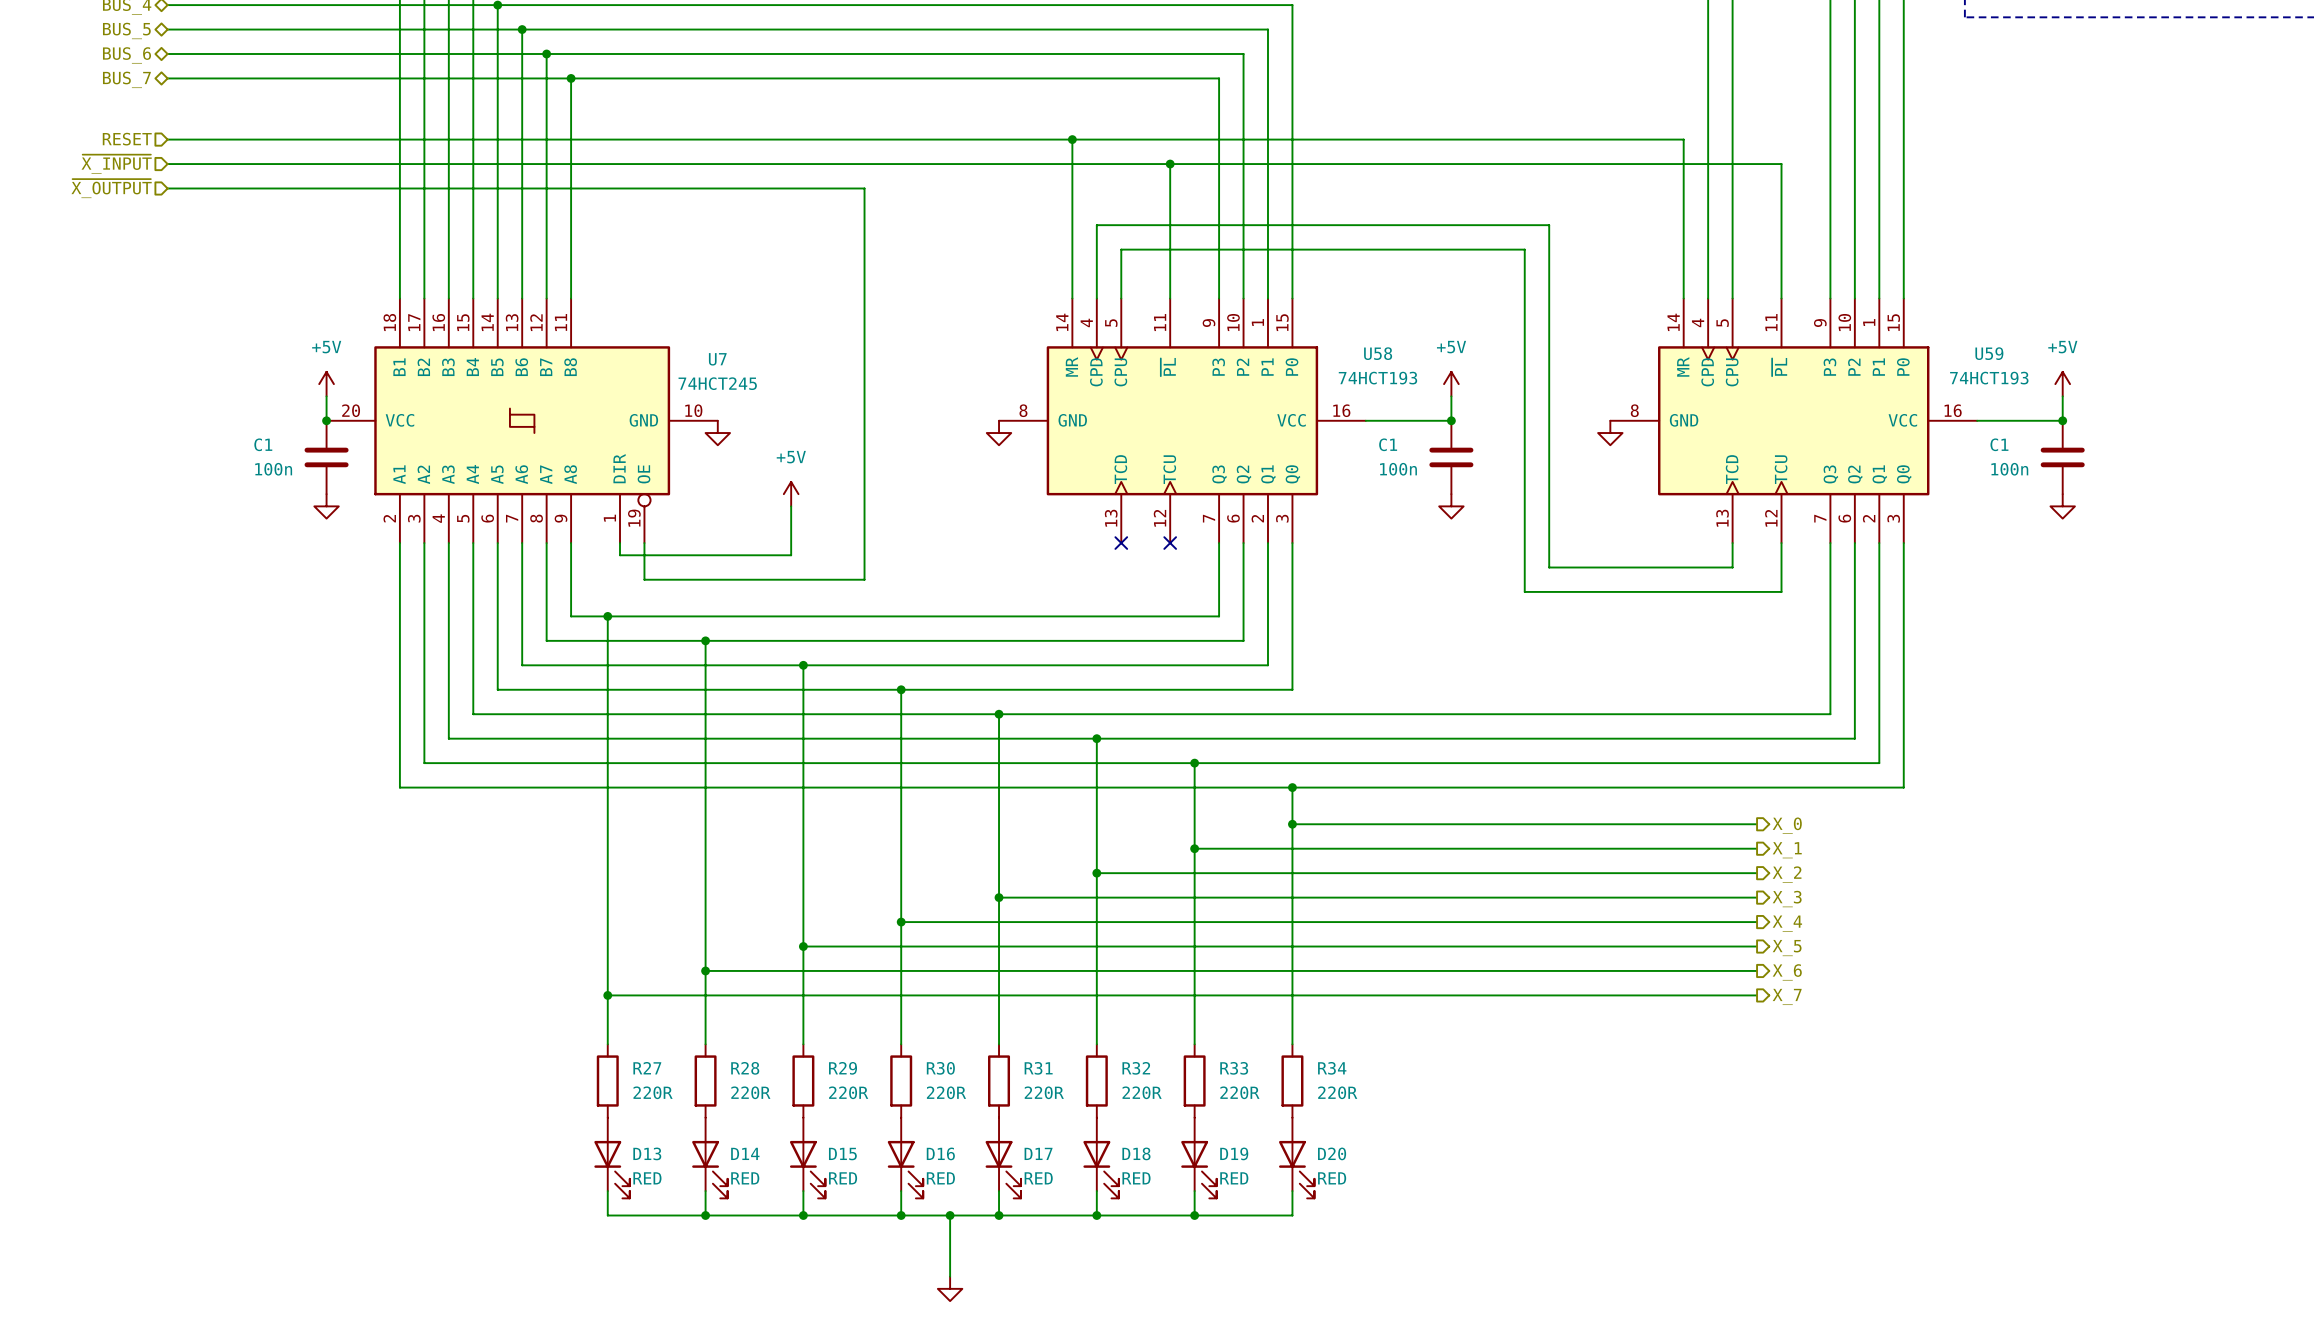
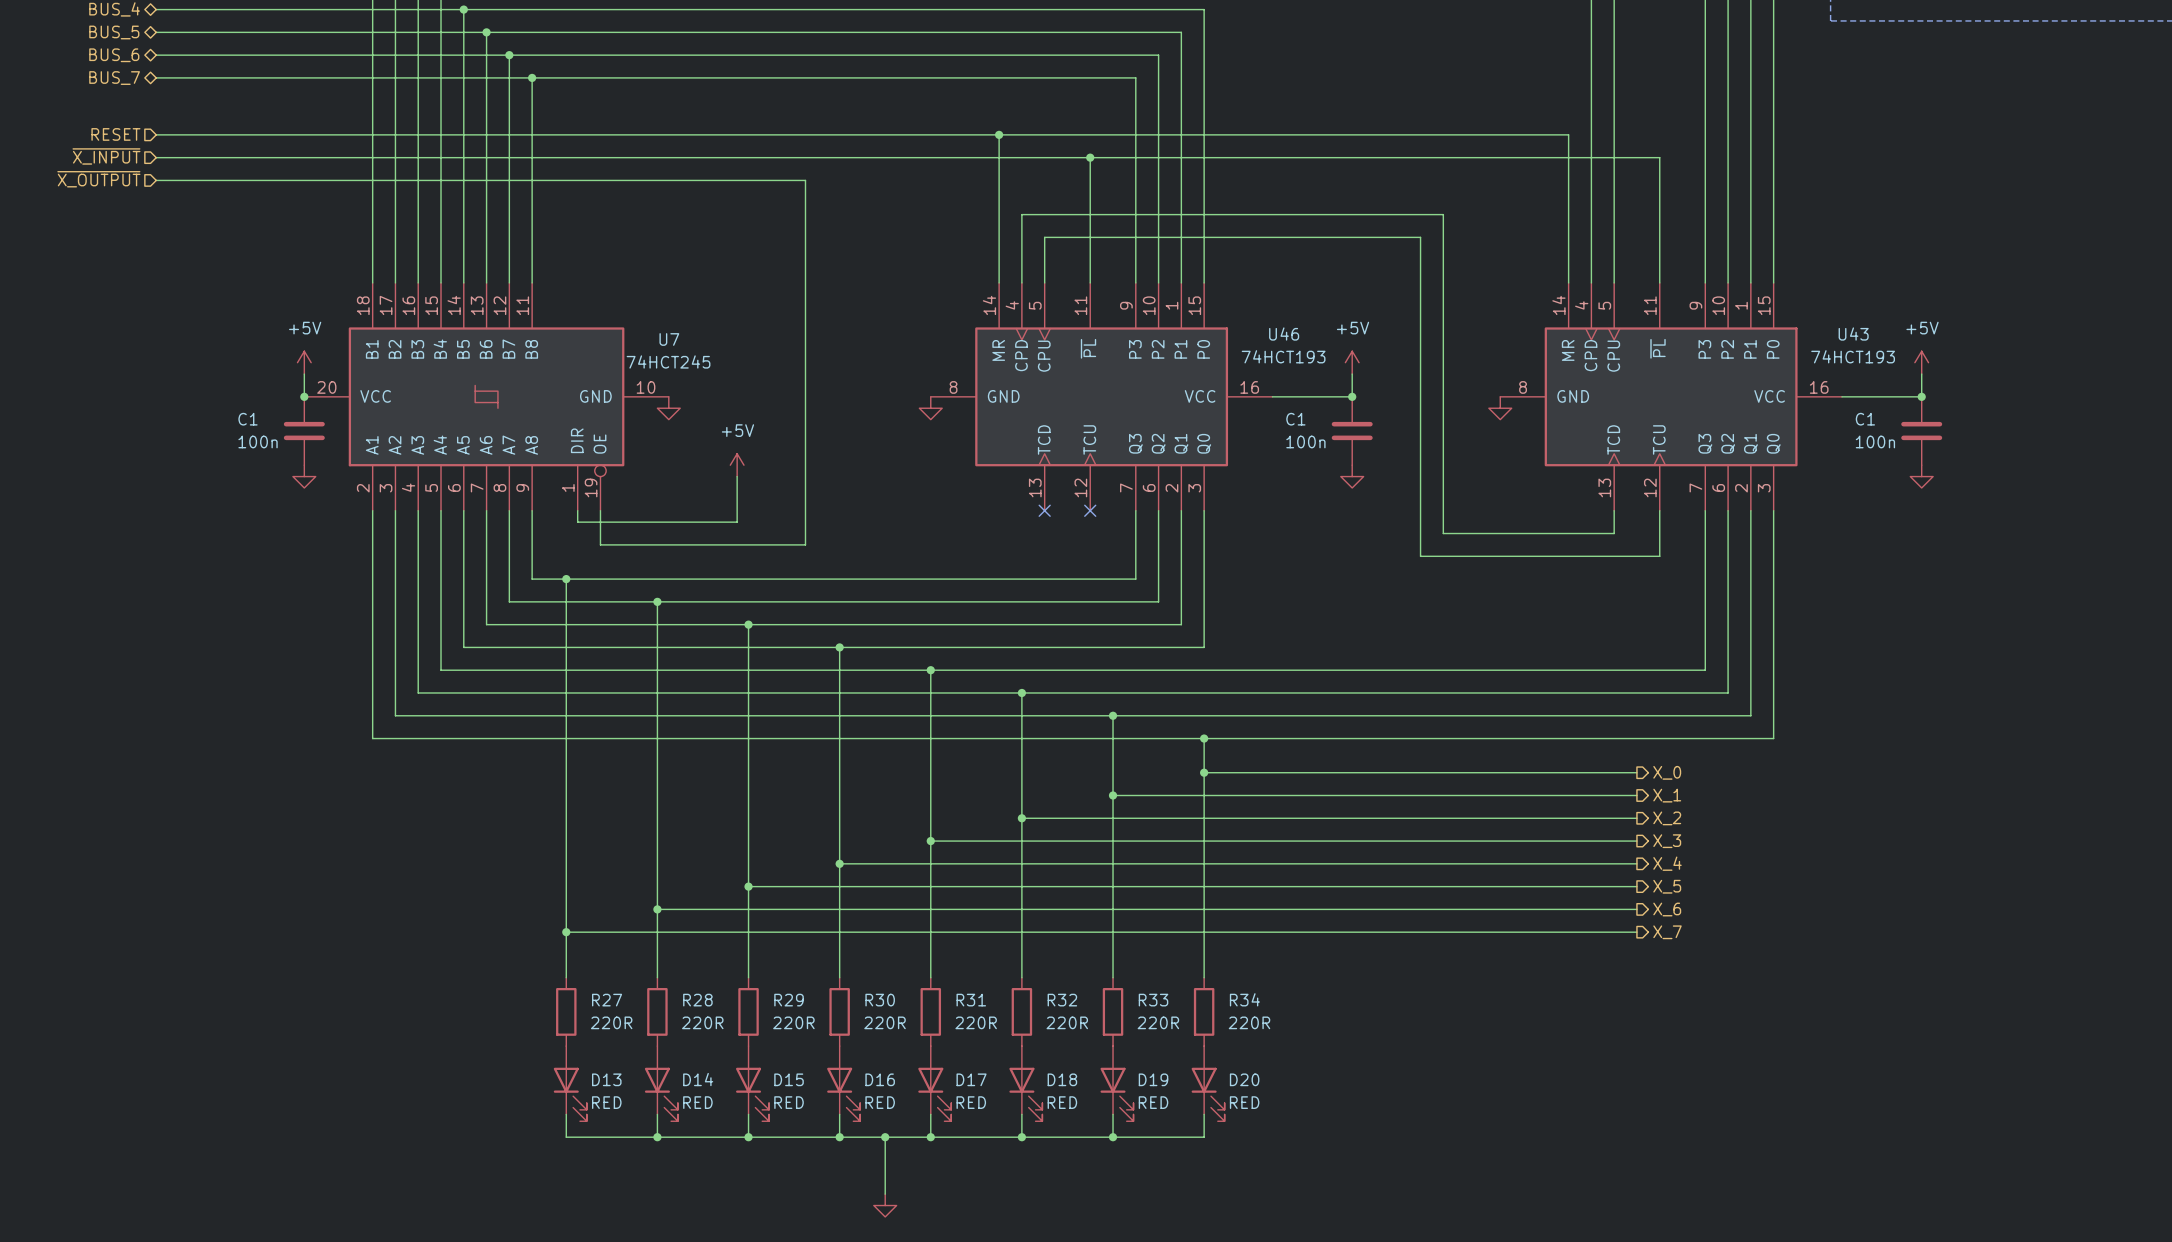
U58 name: U58 (1378, 353) -> U46 (1284, 334)
U59 name: U59 (1989, 353) -> U43 (1853, 334)

